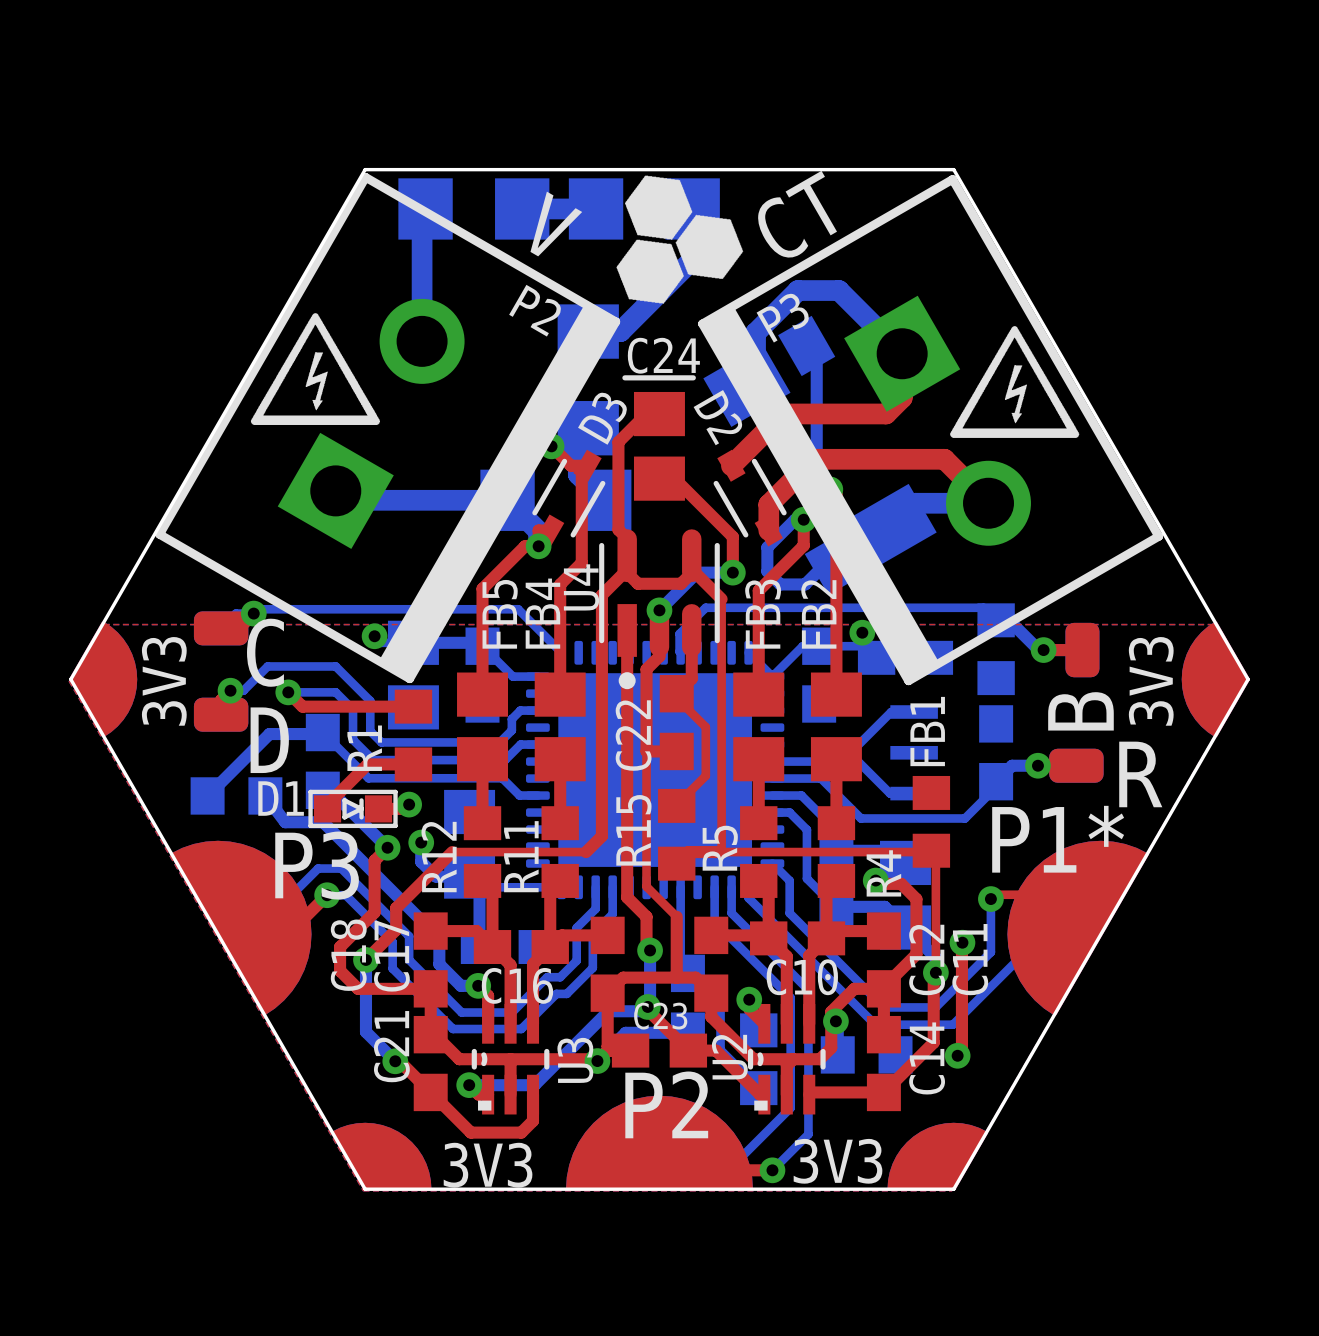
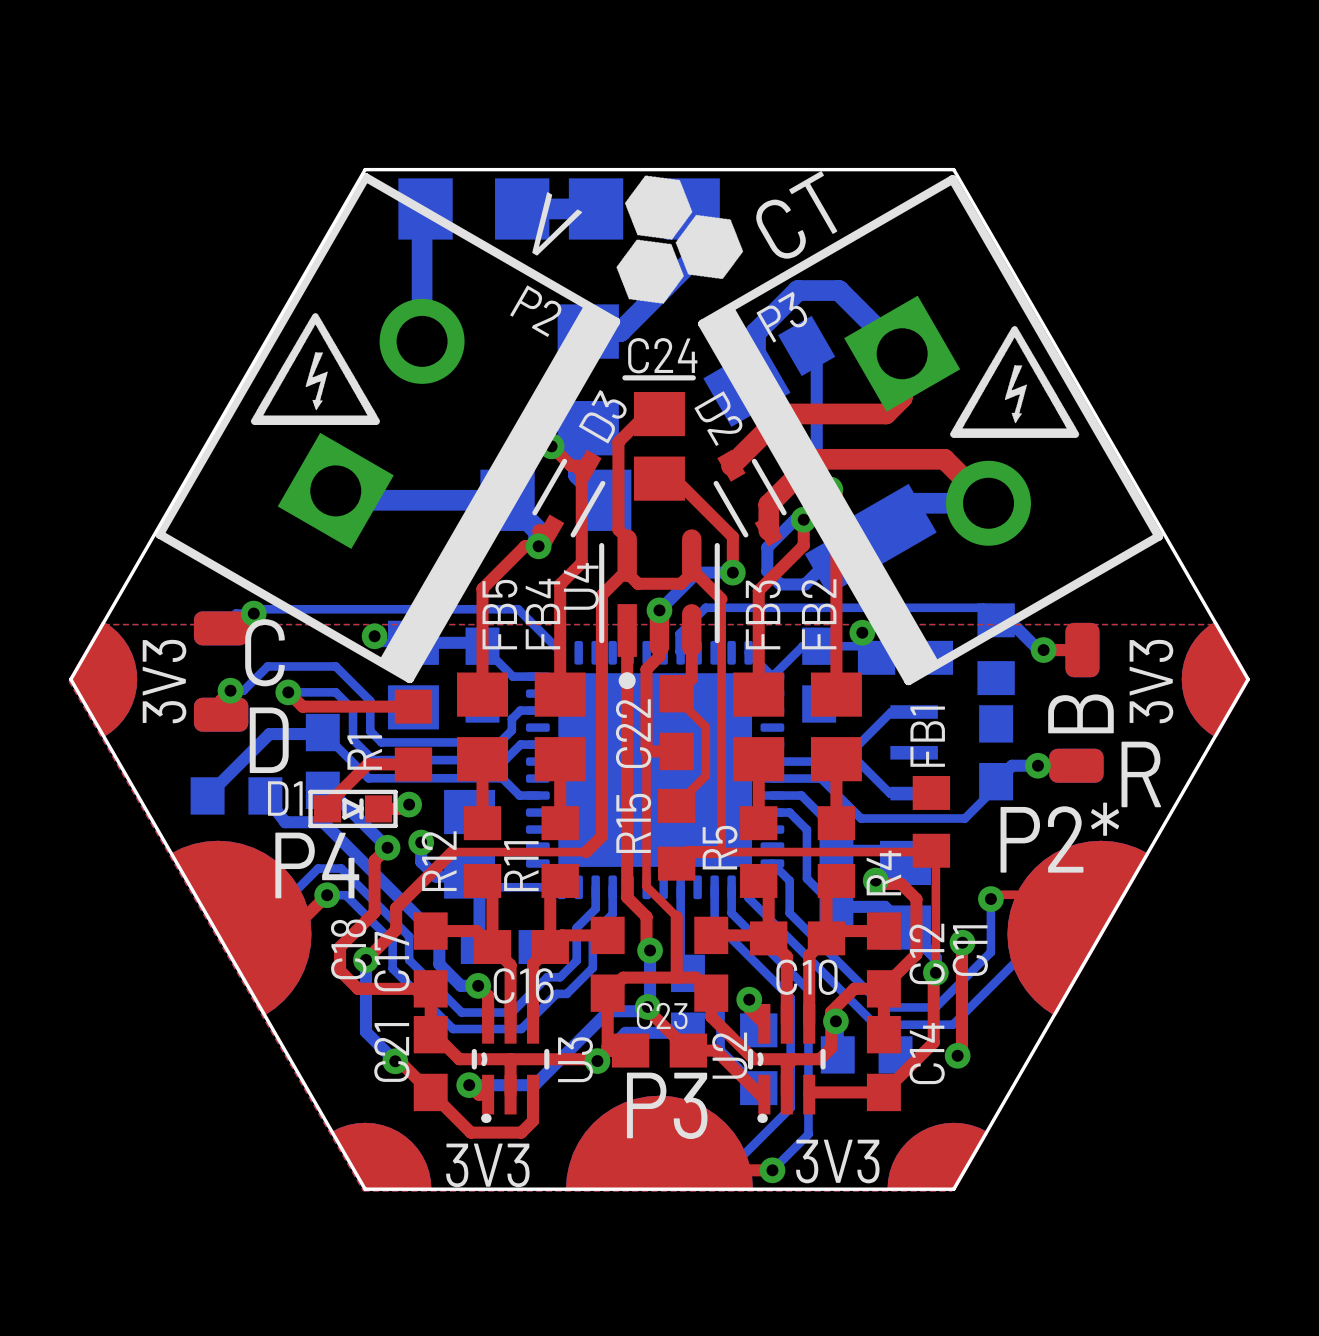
text: P1* (1058, 839) -> P2* (1059, 837)
text: P3 (317, 865) -> P4 (317, 865)
text: P2 (666, 1104) -> P3 (667, 1105)

